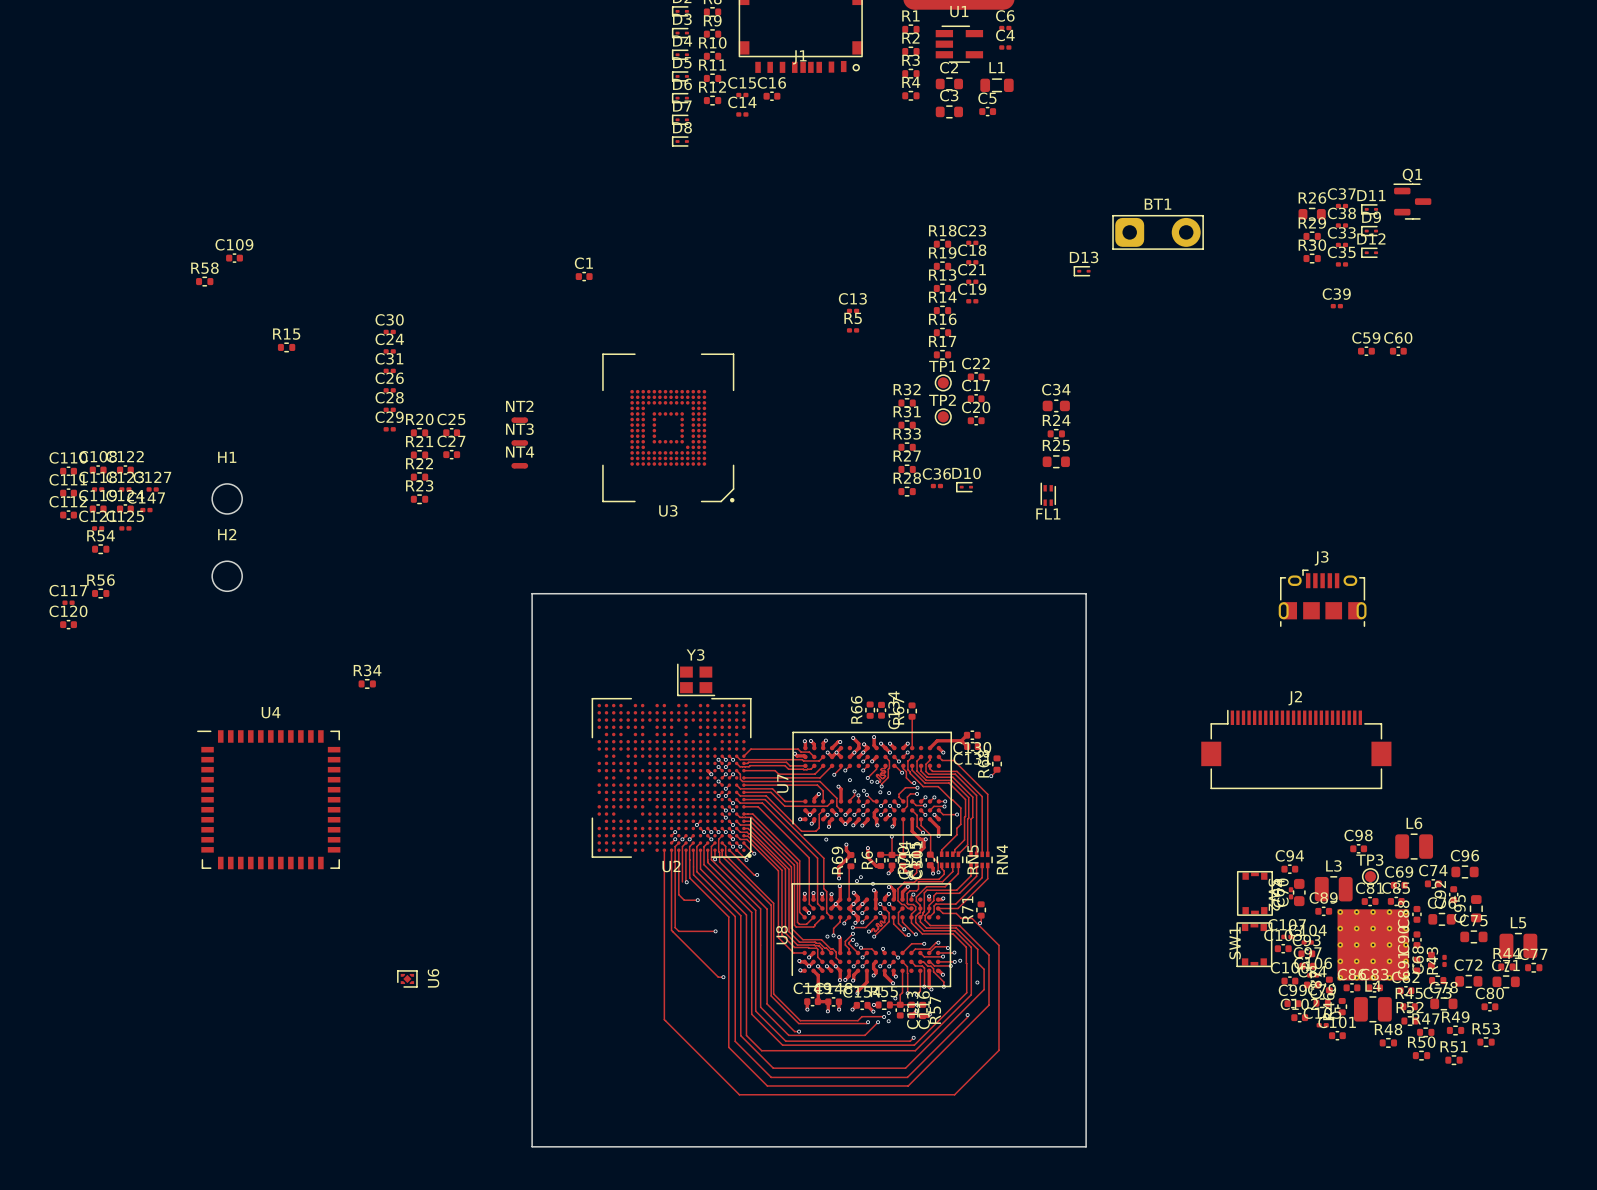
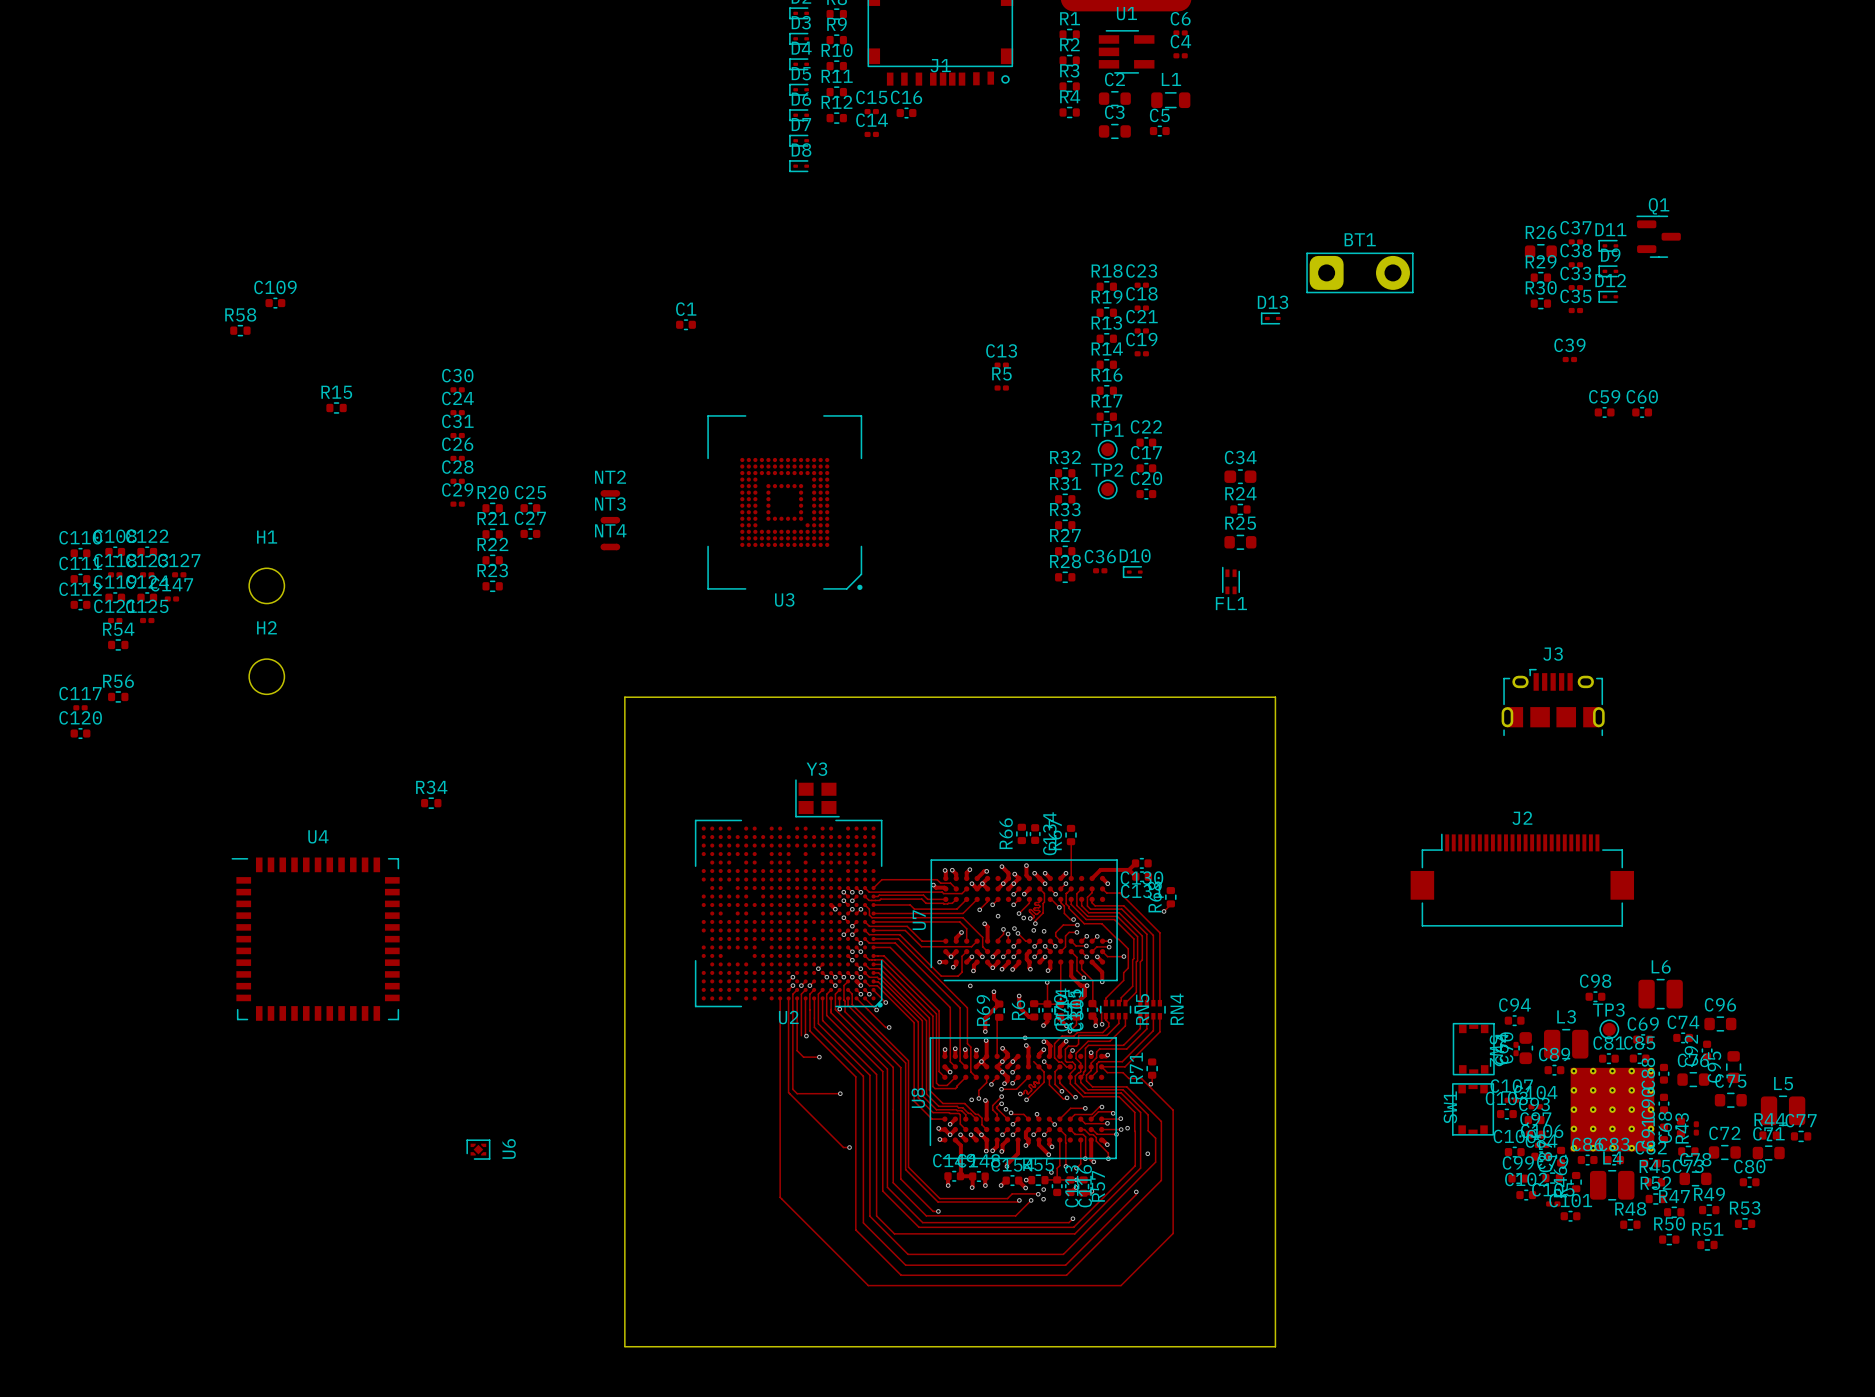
via: (860, 877) -> none
via: (856, 881) -> none
via: (880, 904) -> none
track: (880, 912) (884, 917) -> none
via: (880, 912) -> none

